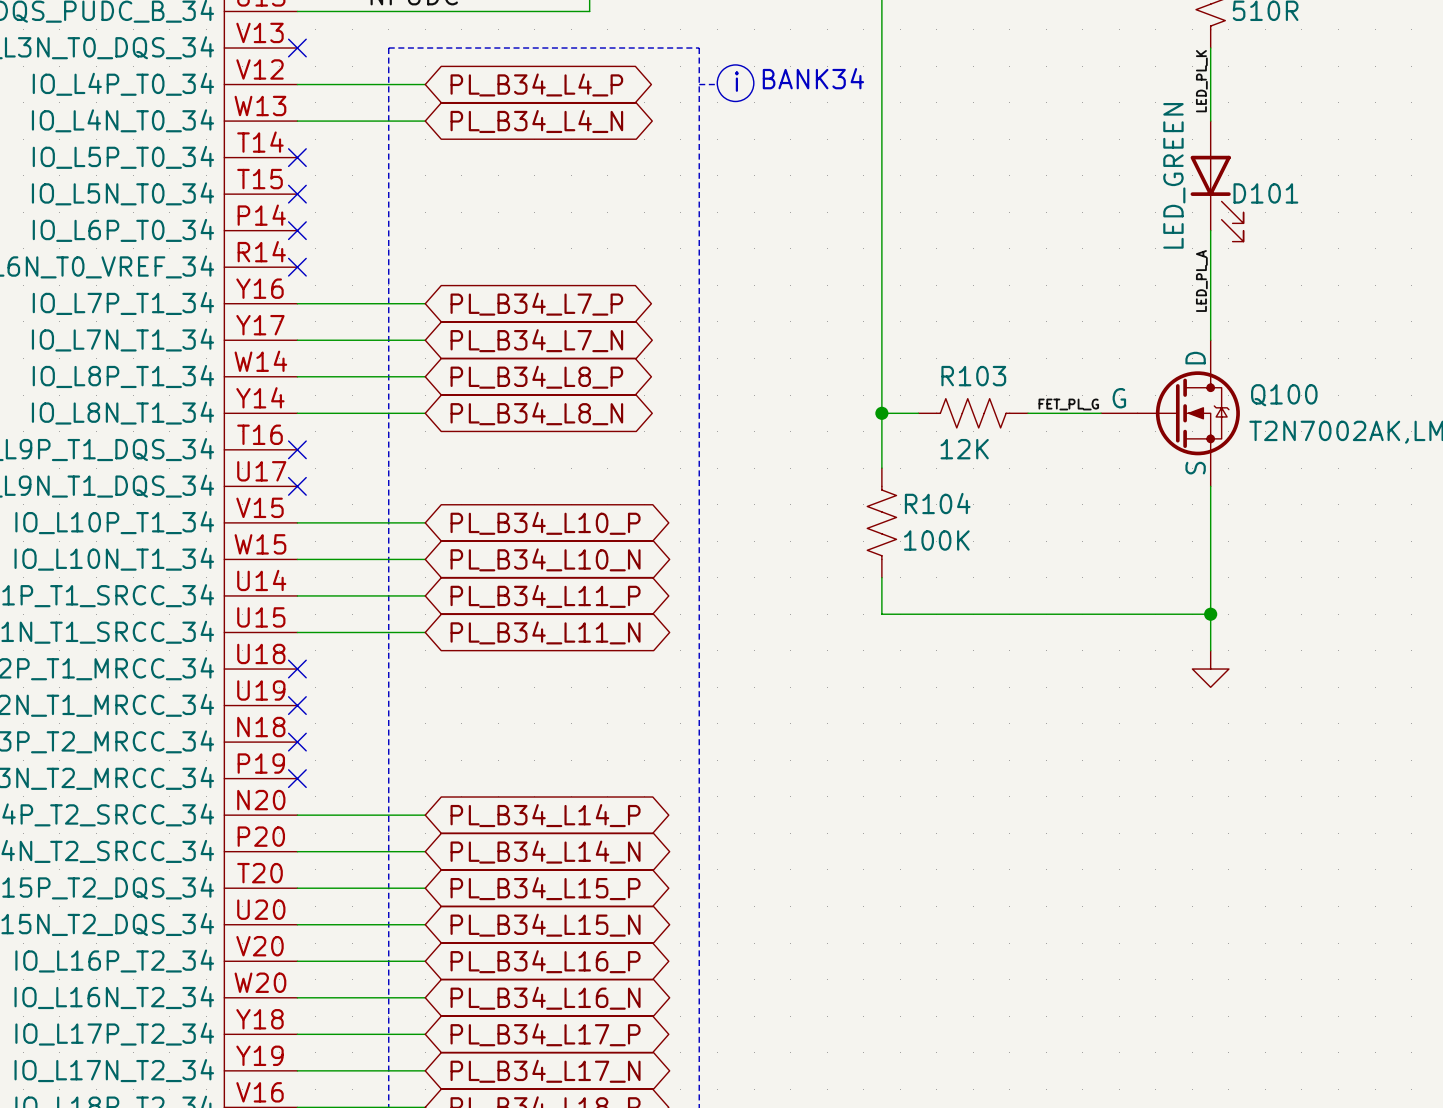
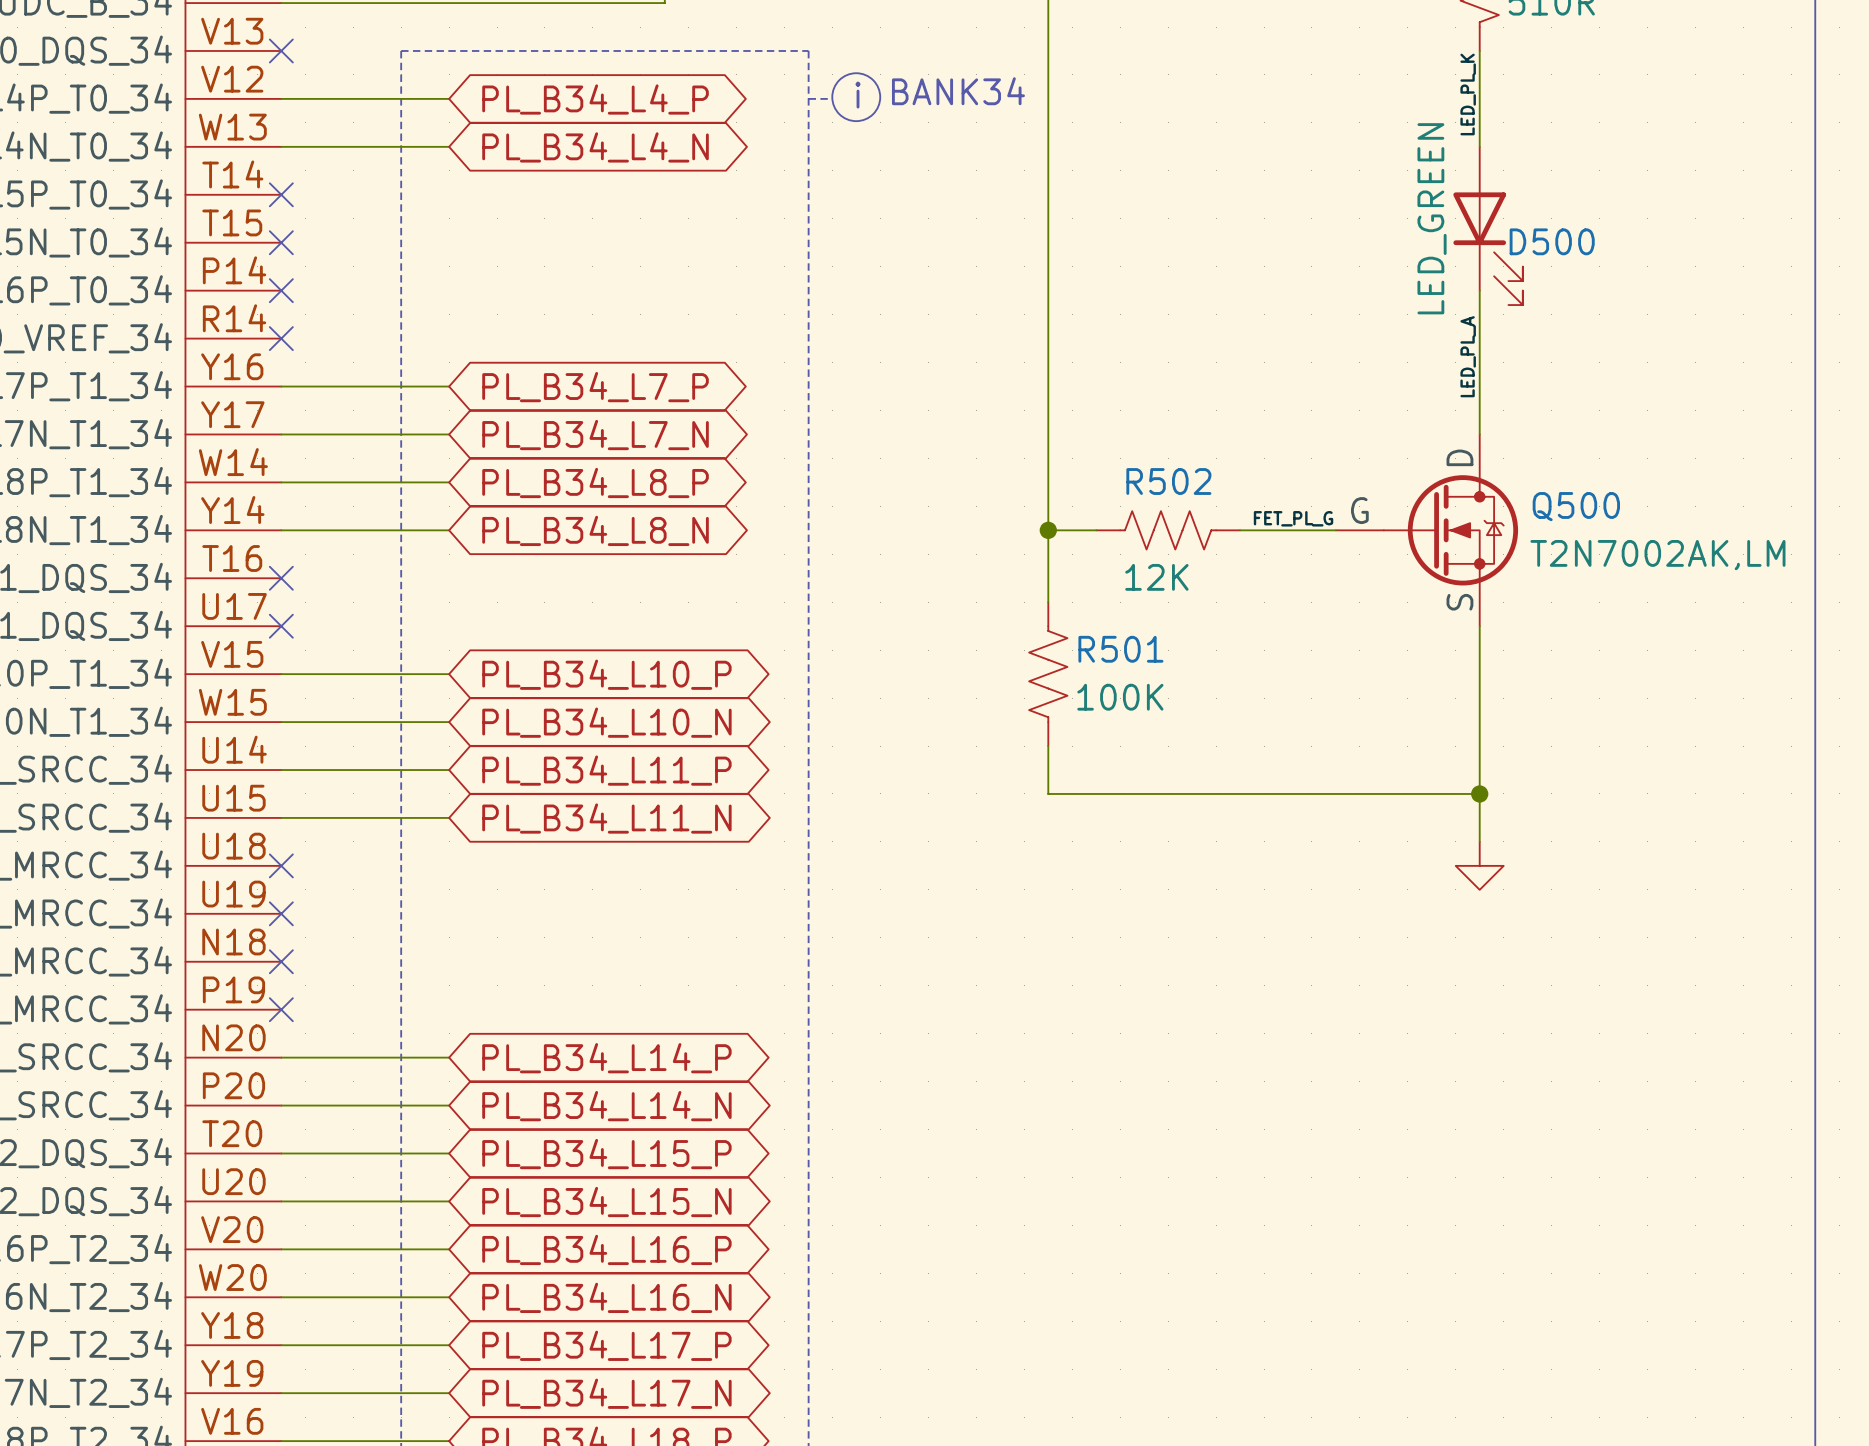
D101 name: D101 (1265, 193) -> D500 (1552, 241)
R103 name: R103 (973, 376) -> R502 (1168, 481)
Q100 name: Q100 (1284, 395) -> Q500 (1576, 506)
R104 name: R104 (937, 503) -> R501 (1120, 649)

